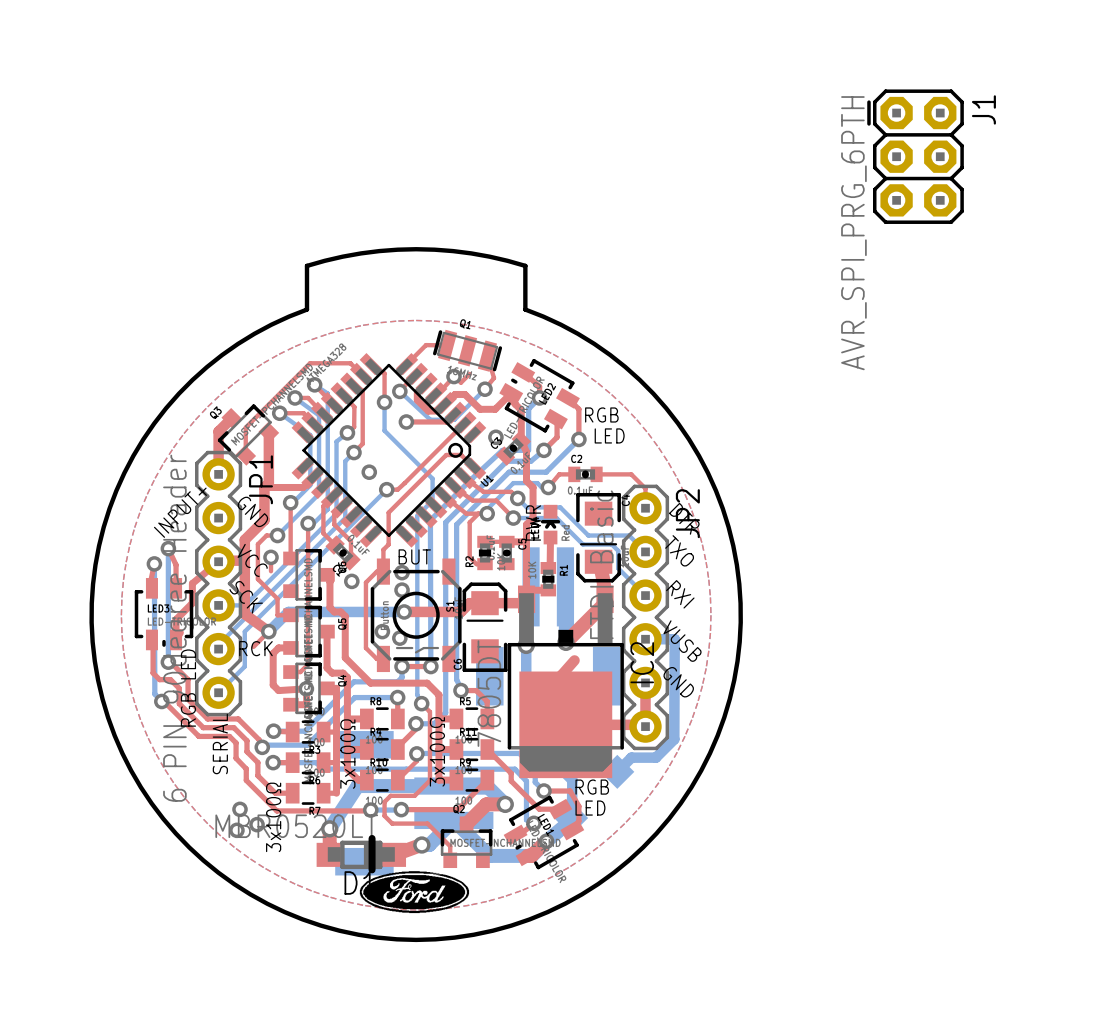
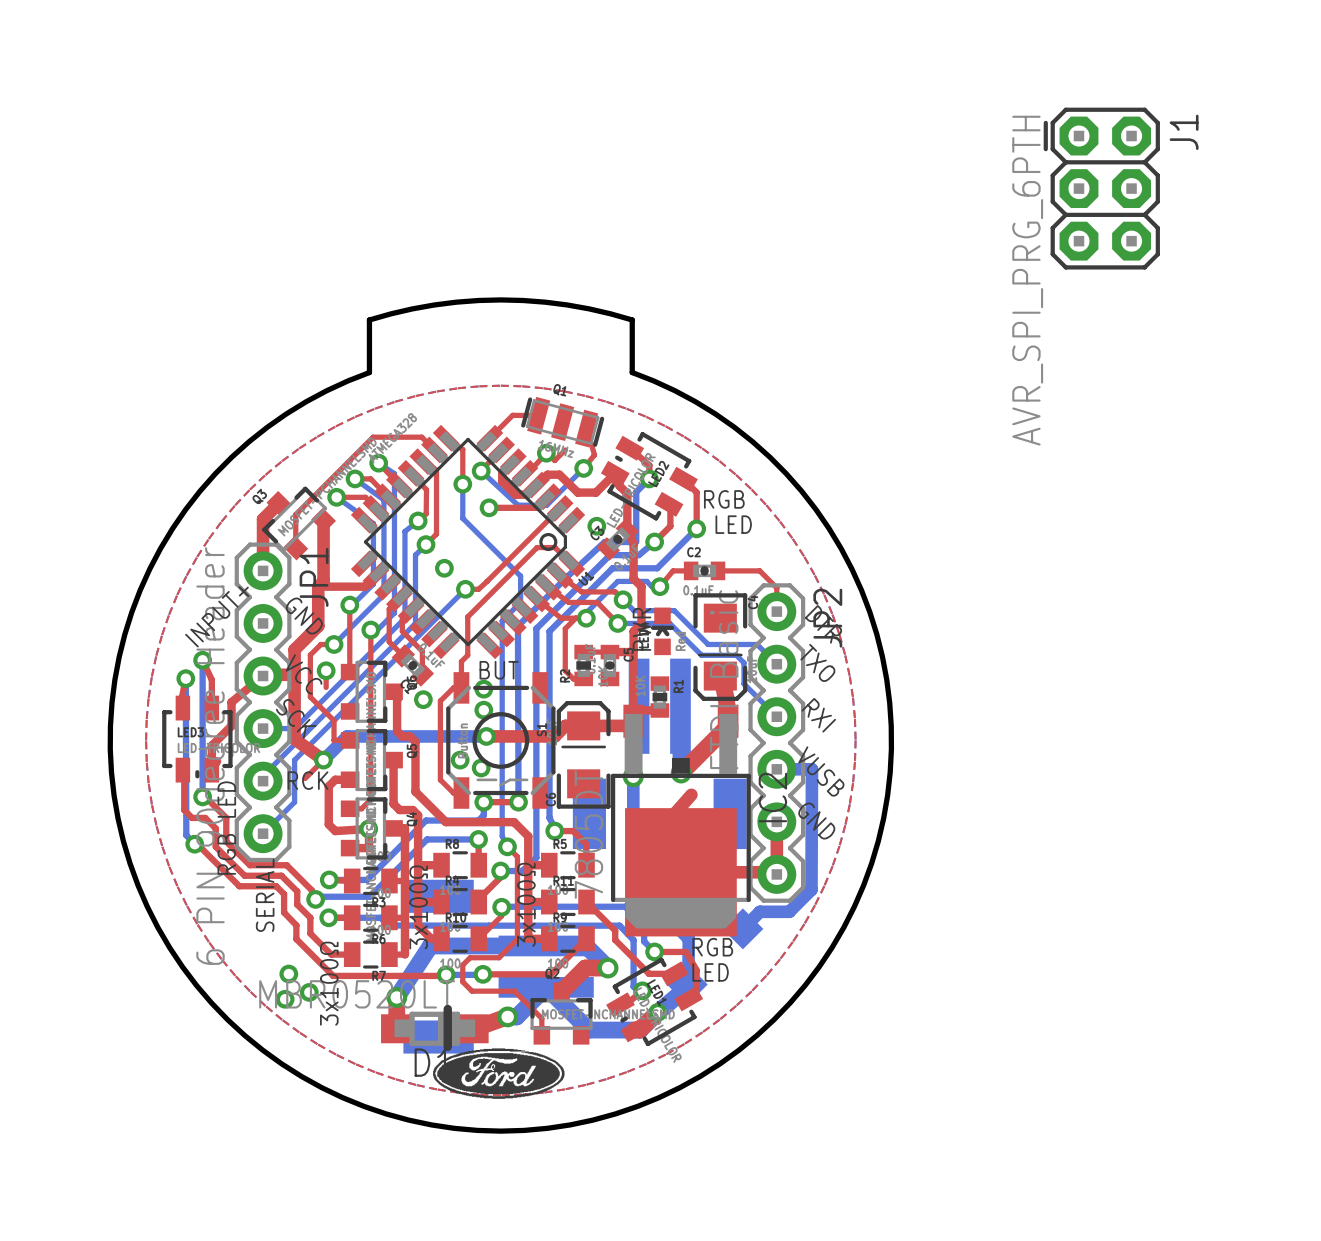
top track: (550, 537) (550, 568) (548, 568) -> none

